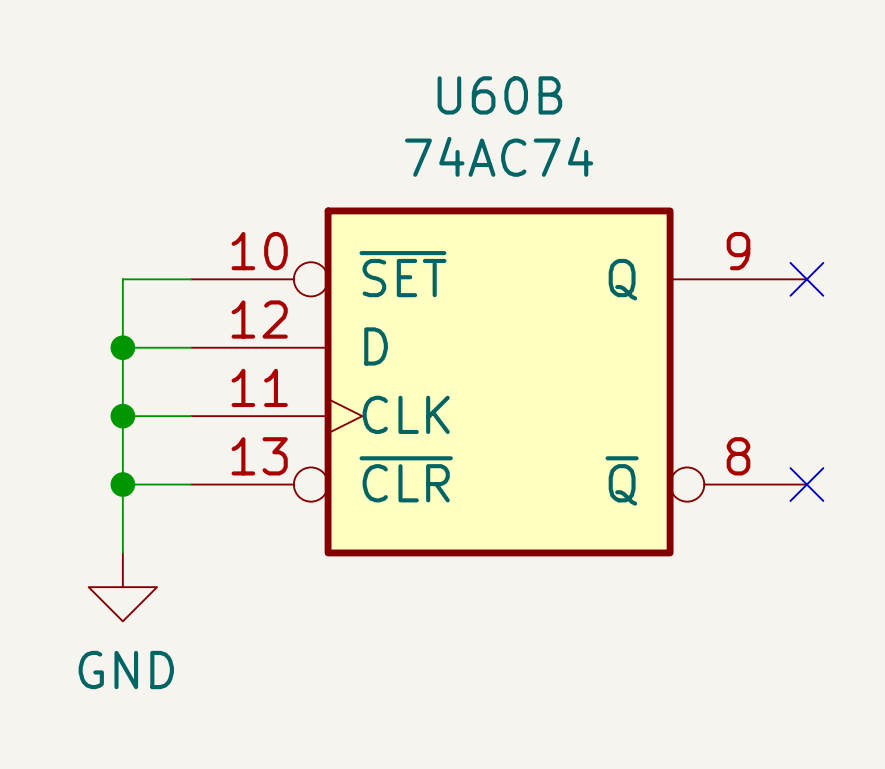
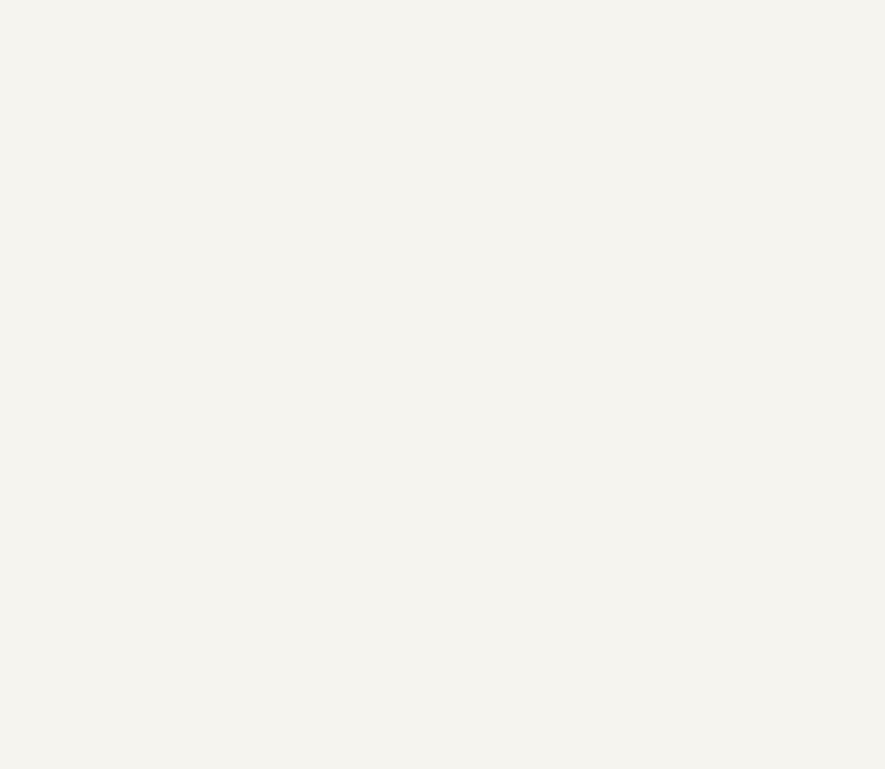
wire: (191, 279) (122, 279) (122, 552) -> none
no-connect mark: (806, 279) -> none
wire: (122, 347) (191, 347) -> none
junction: (122, 347) -> none
U60B: 74AC74 (499, 381) -> none
wire: (122, 416) (191, 416) -> none
junction: (122, 416) -> none
wire: (122, 484) (191, 484) -> none
junction: (122, 484) -> none
no-connect mark: (806, 484) -> none
power symbol: GND (122, 587) -> none

